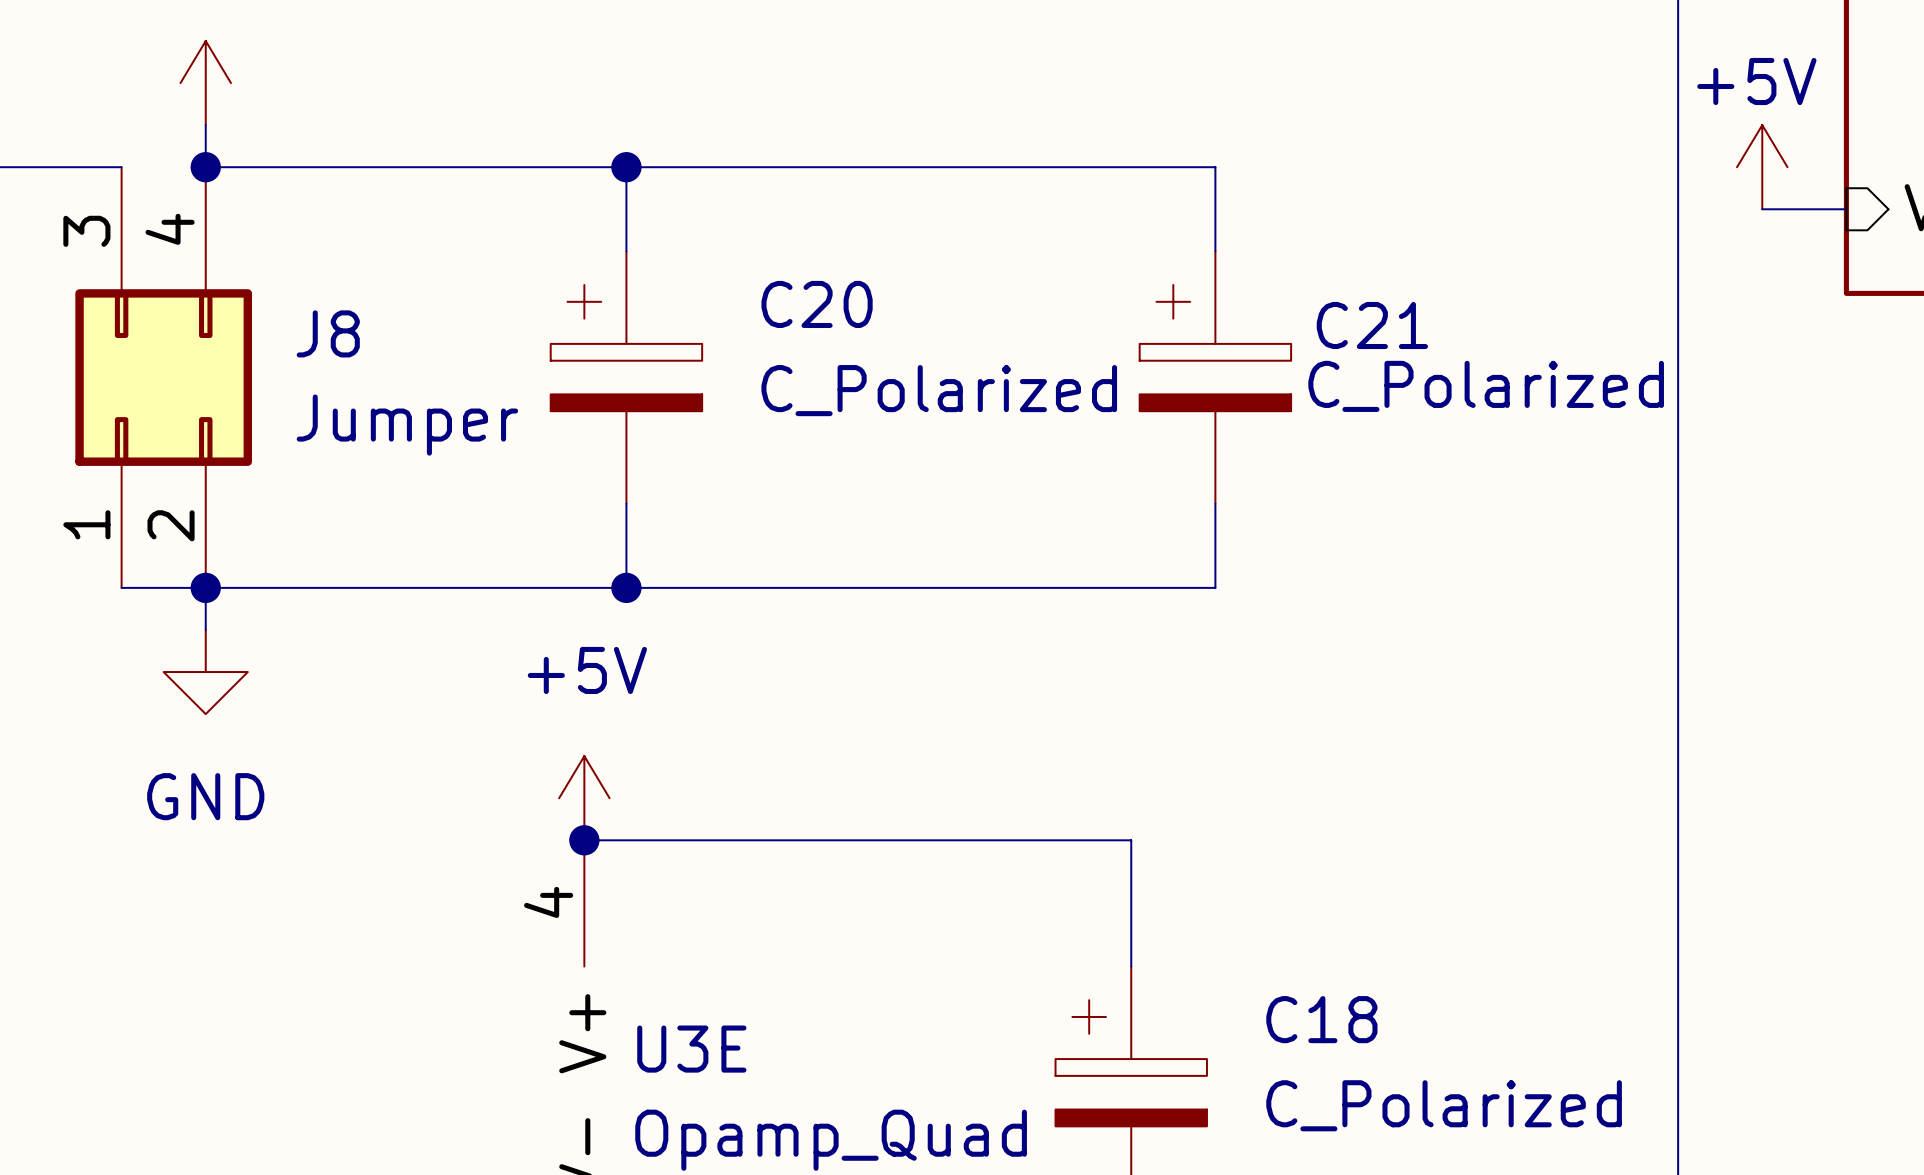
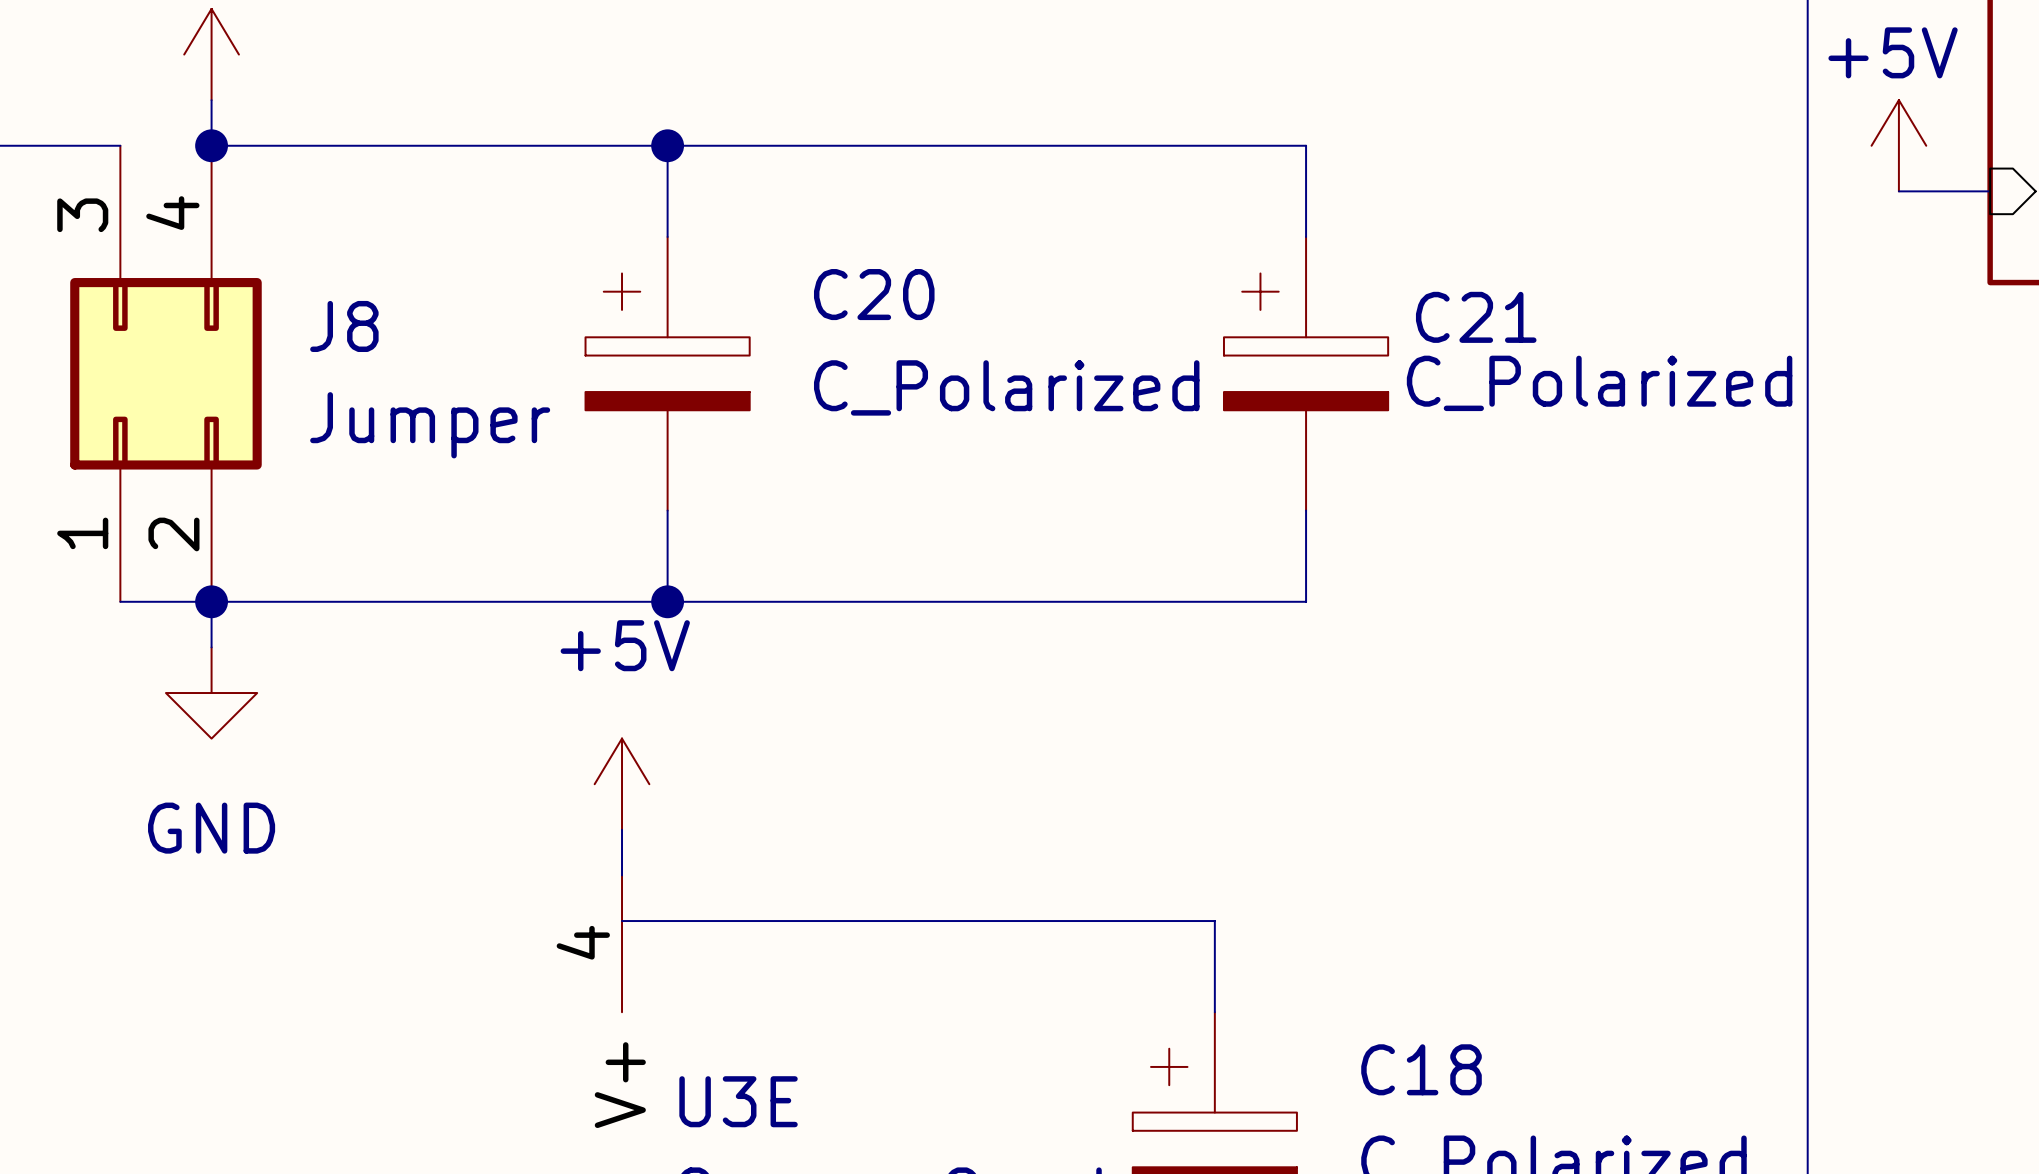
power symbol position: +5V (584, 798) -> +5V (622, 784)
wire: (584, 840) (1131, 840) (1131, 882) -> (622, 921) (1214, 921)
junction: (584, 840) -> none

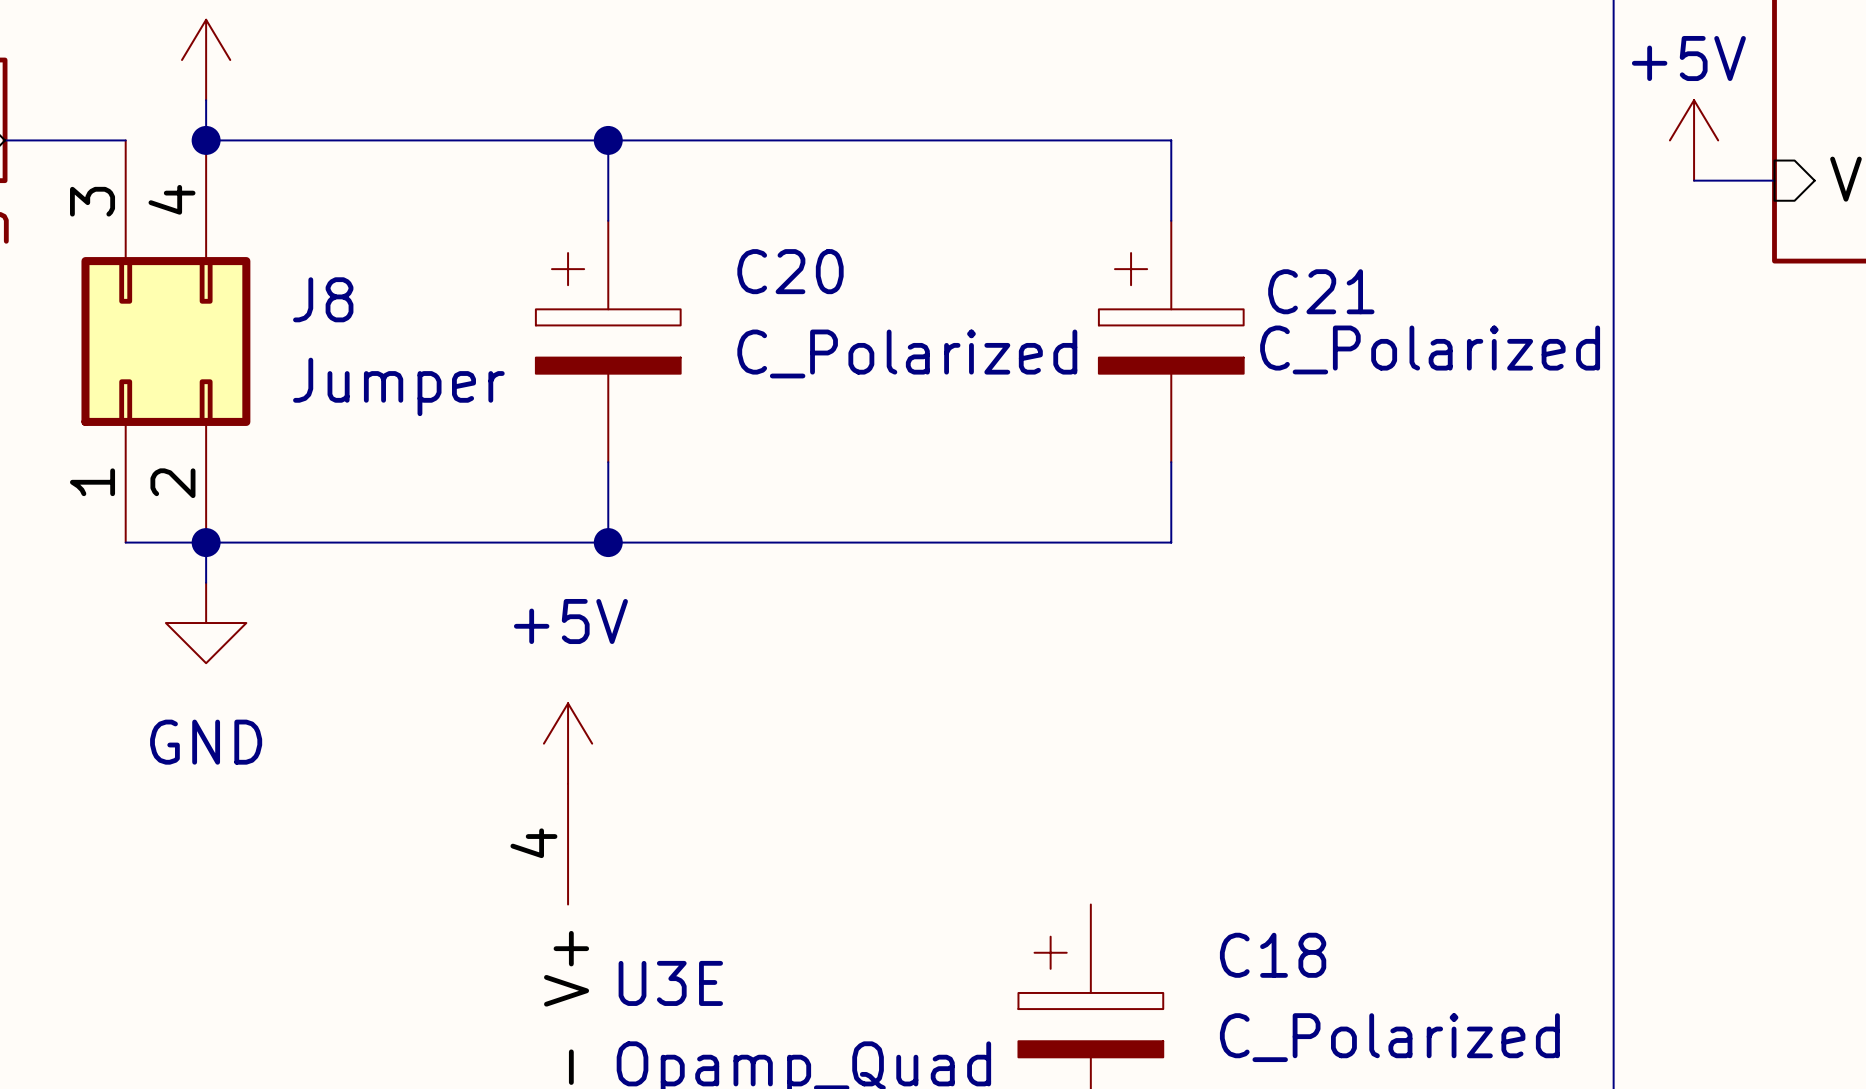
power symbol position: +5V (622, 784) -> +5V (568, 743)
wire: (622, 921) (1214, 921) (1214, 1012) -> none

